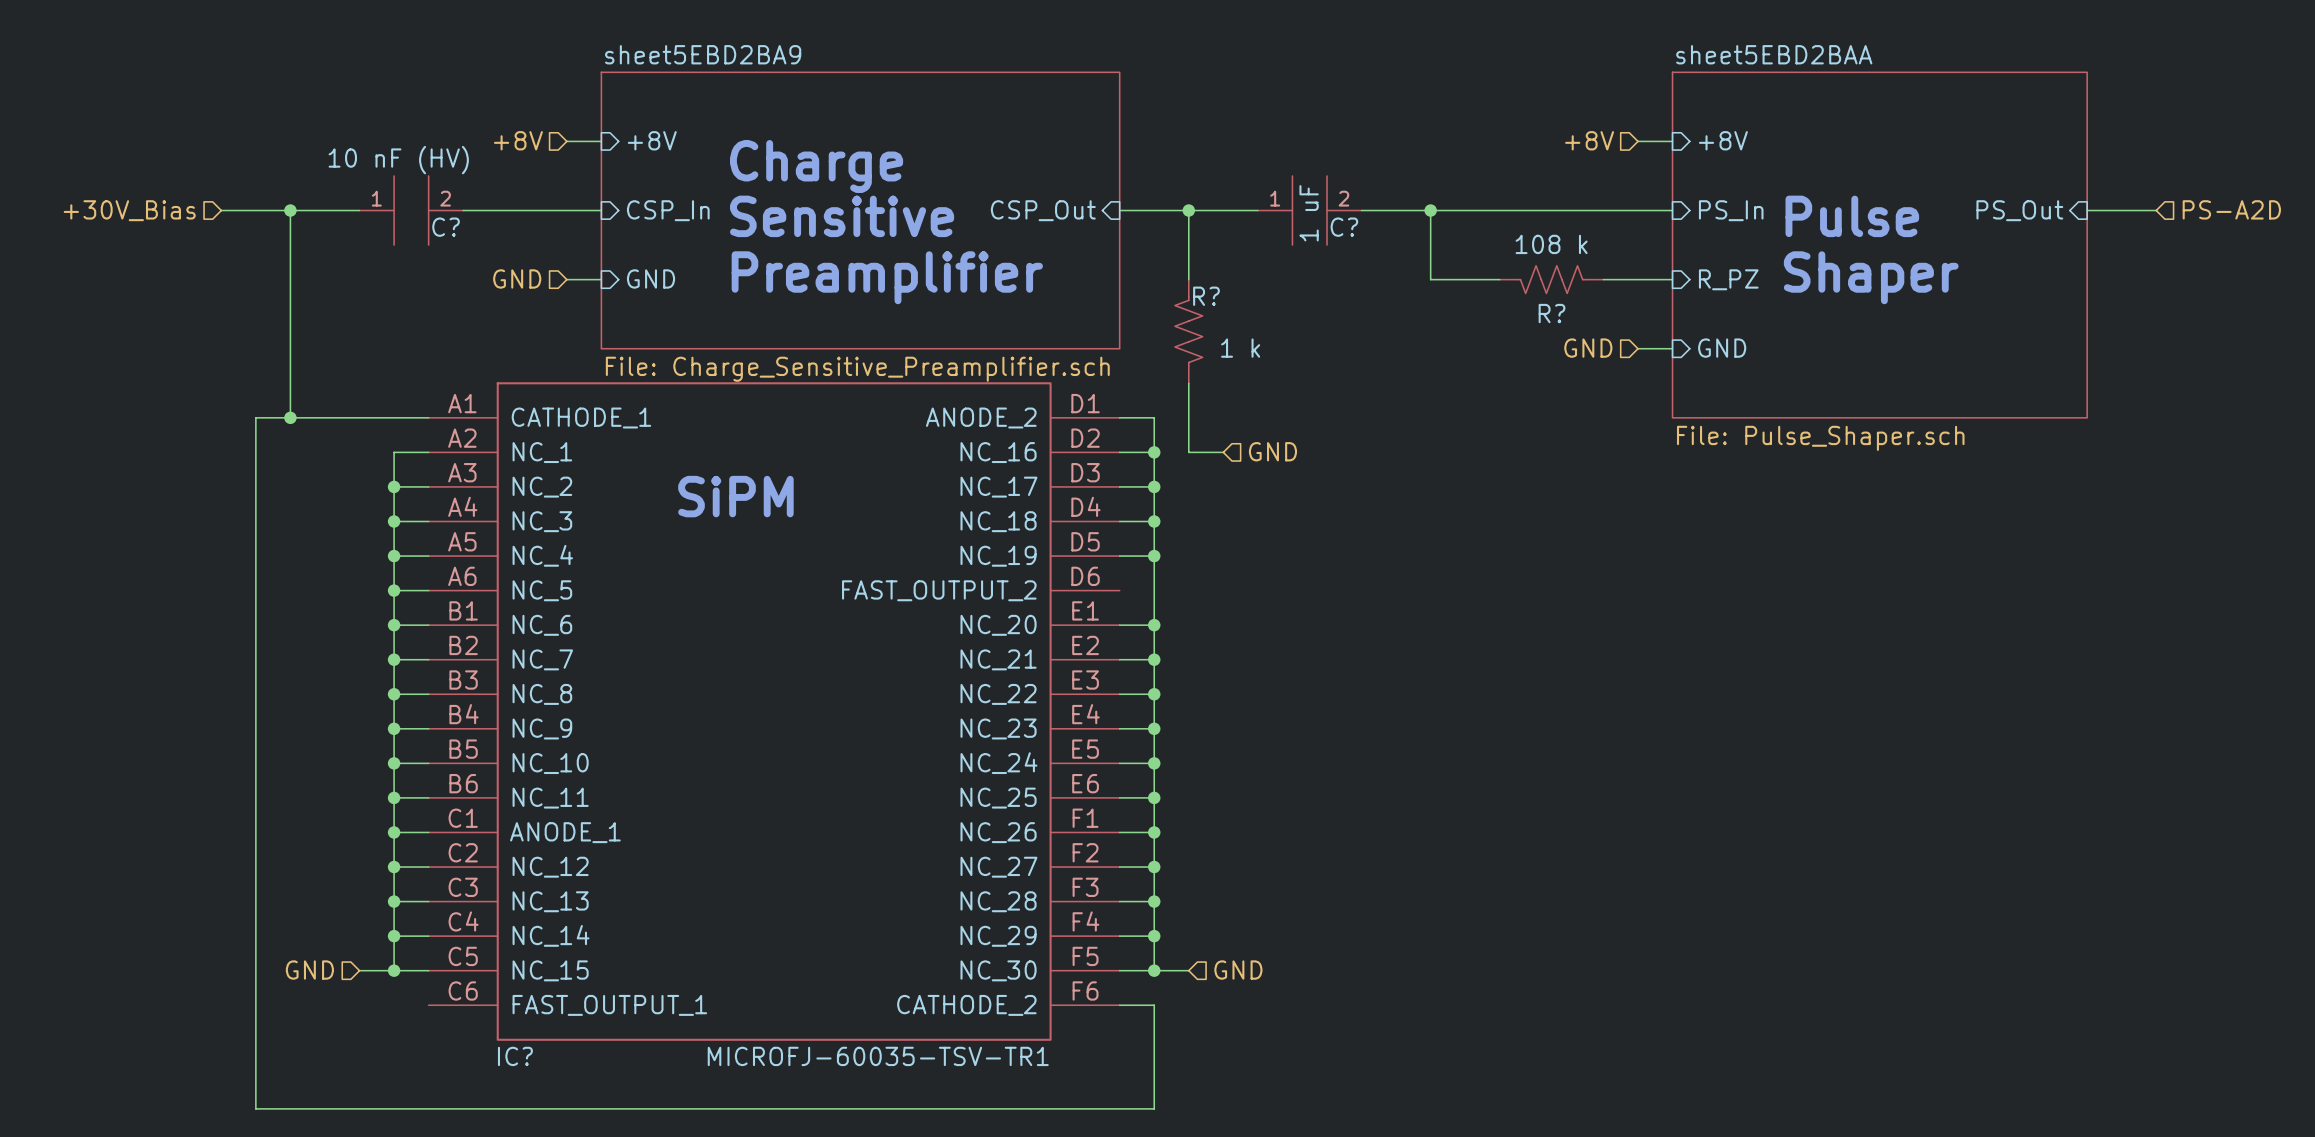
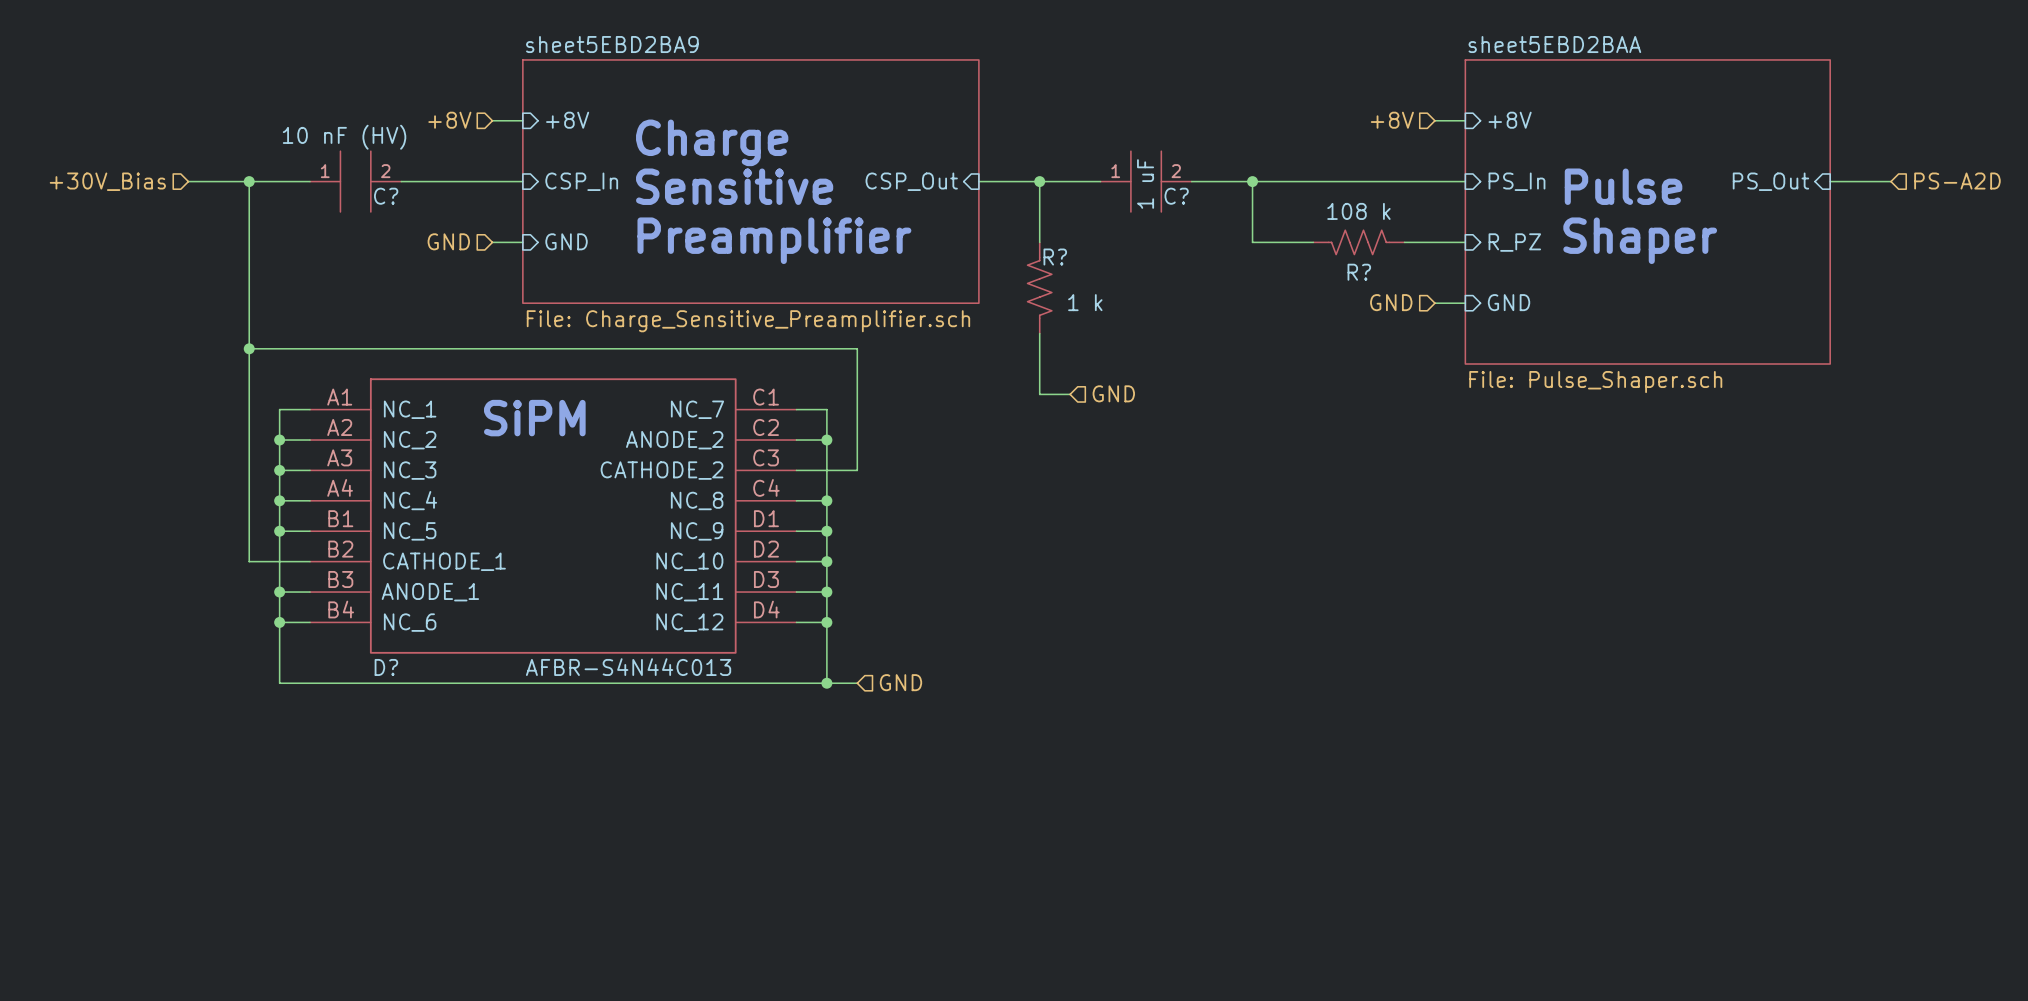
wire: none -> (249, 348) (857, 348) (857, 470) (796, 470)
wire: none -> (249, 364) (249, 561) (310, 561)
junction position: (290, 417) -> (249, 348)
wire: (428, 417) (255, 417) (255, 1108) (1154, 1108) (1154, 1005) (1119, 1005) -> none
wire: (1119, 417) (1154, 417) (1154, 970) -> none
wire: (428, 452) (394, 452) (394, 970) -> none
wire: (1119, 452) (1154, 452) -> none
junction: (1154, 452) -> none
wire: none -> (310, 409) (279, 409) (279, 683) (857, 683)
wire: none -> (796, 409) (826, 409) (826, 683)
wire: (394, 486) (428, 486) -> none
junction: (394, 486) -> none
wire: (1119, 486) (1154, 486) -> none
junction: (1154, 486) -> none
text position: SiPM (735, 496) -> SiPM (534, 418)
junction: none -> (279, 440)
junction: none -> (826, 440)
wire: (394, 521) (428, 521) -> (279, 440) (310, 440)
junction: (394, 521) -> none
wire: (1119, 521) (1154, 521) -> none
junction: (1154, 521) -> none
junction: none -> (279, 470)
wire: (394, 556) (428, 556) -> (279, 470) (310, 470)
junction: (394, 556) -> none
wire: (1119, 556) (1154, 556) -> (796, 440) (826, 440)
junction: (1154, 556) -> none
junction: none -> (279, 500)
junction: none -> (826, 500)
wire: (394, 590) (428, 590) -> (279, 500) (310, 500)
junction: (394, 590) -> none
D?: none -> AFBR-S4N44C013 (553, 516)
junction: none -> (279, 531)
junction: none -> (826, 531)
wire: (394, 625) (428, 625) -> (279, 531) (310, 531)
junction: (394, 625) -> none
wire: (1119, 625) (1154, 625) -> (796, 500) (826, 500)
junction: (1154, 625) -> none
junction: none -> (826, 561)
wire: (394, 659) (428, 659) -> none
junction: (394, 659) -> none
wire: (1119, 659) (1154, 659) -> (796, 531) (826, 531)
junction: (1154, 659) -> none
junction: none -> (279, 592)
junction: none -> (826, 592)
wire: (394, 694) (428, 694) -> (279, 592) (310, 592)
junction: (394, 694) -> none
wire: (1119, 694) (1154, 694) -> (796, 561) (826, 561)
junction: (1154, 694) -> none
junction: none -> (279, 622)
IC?: MICROFJ-60035-TSV-TR1 (774, 711) -> none
junction: none -> (826, 622)
wire: (394, 728) (428, 728) -> (279, 622) (310, 622)
junction: (394, 728) -> none
wire: (1119, 728) (1154, 728) -> (796, 592) (826, 592)
junction: (1154, 728) -> none
wire: (394, 763) (428, 763) -> none
junction: (394, 763) -> none
wire: (1119, 763) (1154, 763) -> (796, 622) (826, 622)
junction: (1154, 763) -> none
junction: none -> (826, 683)
wire: (394, 797) (428, 797) -> none
junction: (394, 797) -> none
wire: (1119, 797) (1154, 797) -> none
junction: (1154, 797) -> none
wire: (394, 832) (428, 832) -> none
junction: (394, 832) -> none
wire: (1119, 832) (1154, 832) -> none
junction: (1154, 832) -> none
wire: (394, 867) (428, 867) -> none
junction: (394, 867) -> none
wire: (1119, 867) (1154, 867) -> none
junction: (1154, 867) -> none
wire: (394, 901) (428, 901) -> none
junction: (394, 901) -> none
wire: (1119, 901) (1154, 901) -> none
junction: (1154, 901) -> none
wire: (394, 936) (428, 936) -> none
junction: (394, 936) -> none
wire: (1119, 936) (1154, 936) -> none
junction: (1154, 936) -> none
hierarchical label: GND (309, 970) -> none
wire: (359, 970) (428, 970) -> none
junction: (394, 970) -> none
wire: (1119, 970) (1188, 970) -> none
junction: (1154, 970) -> none
hierarchical label position: GND (1238, 970) -> GND (900, 682)

